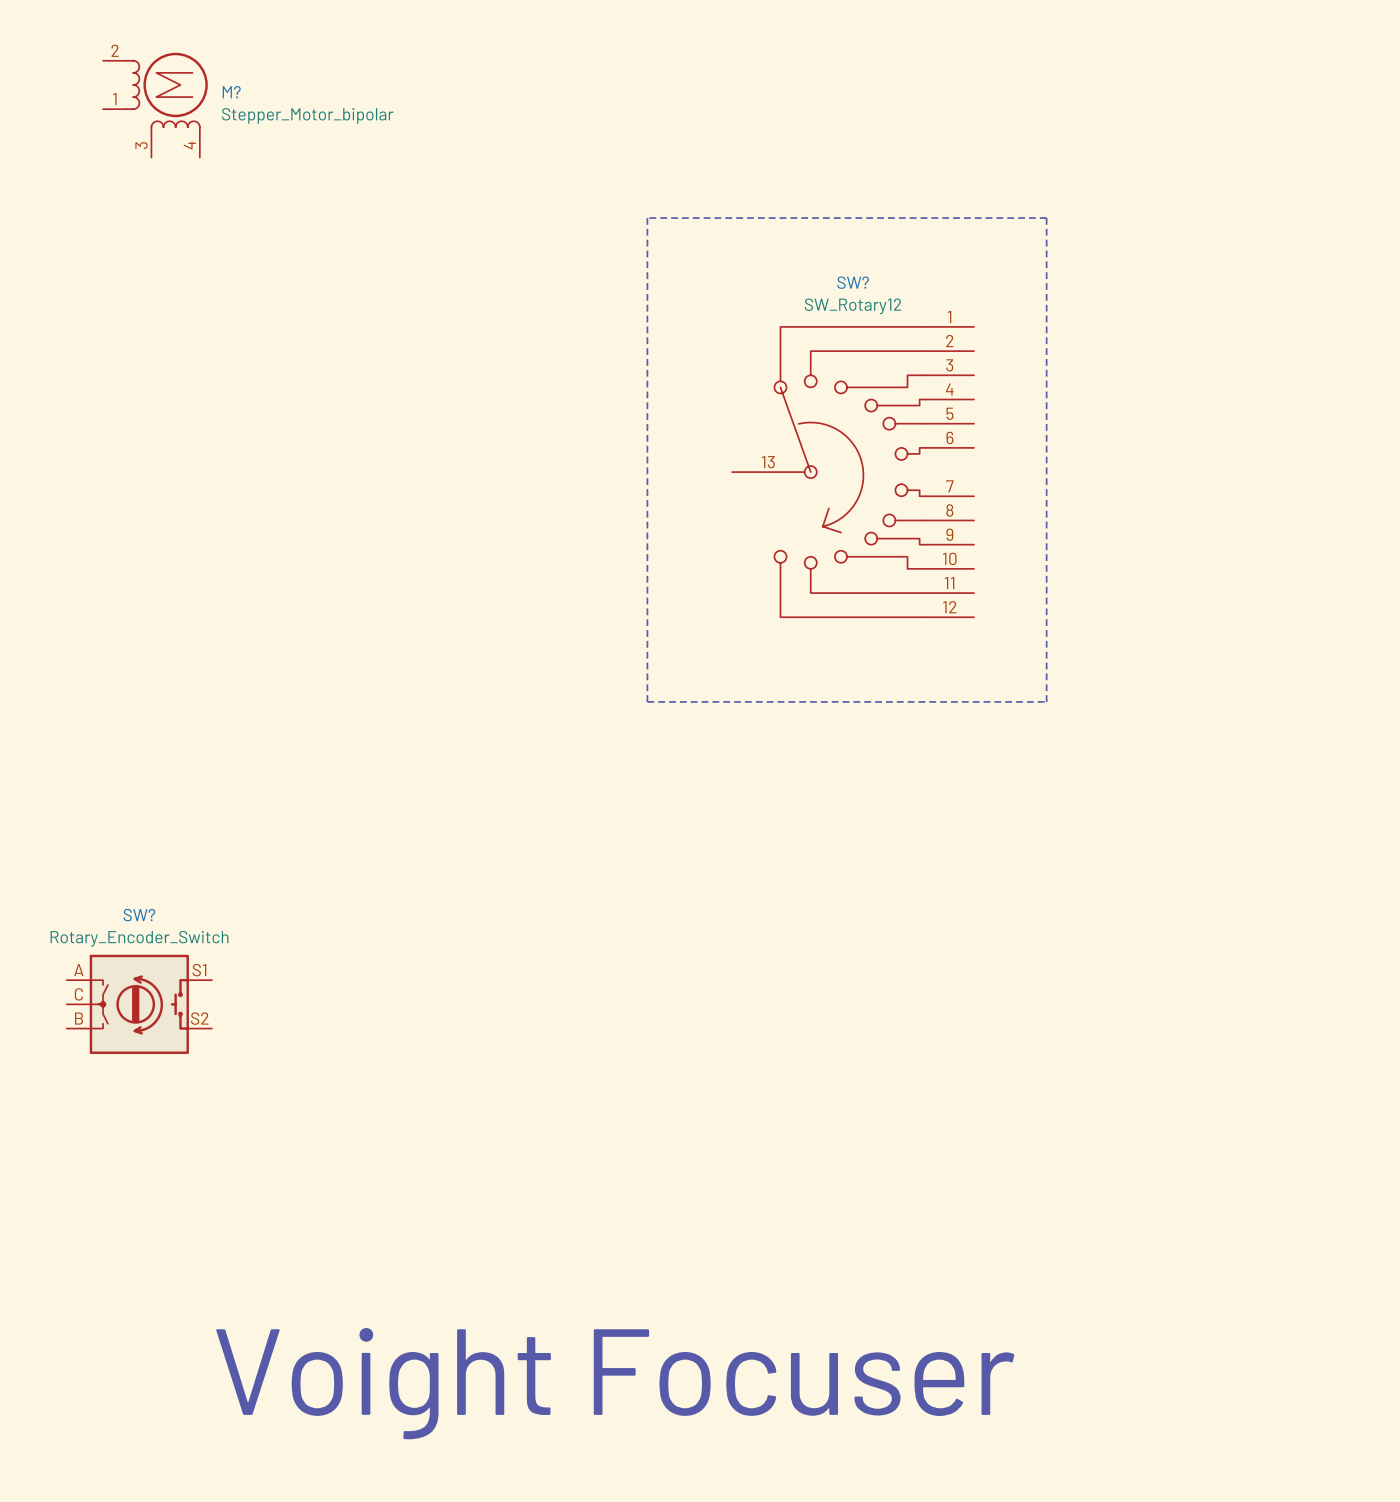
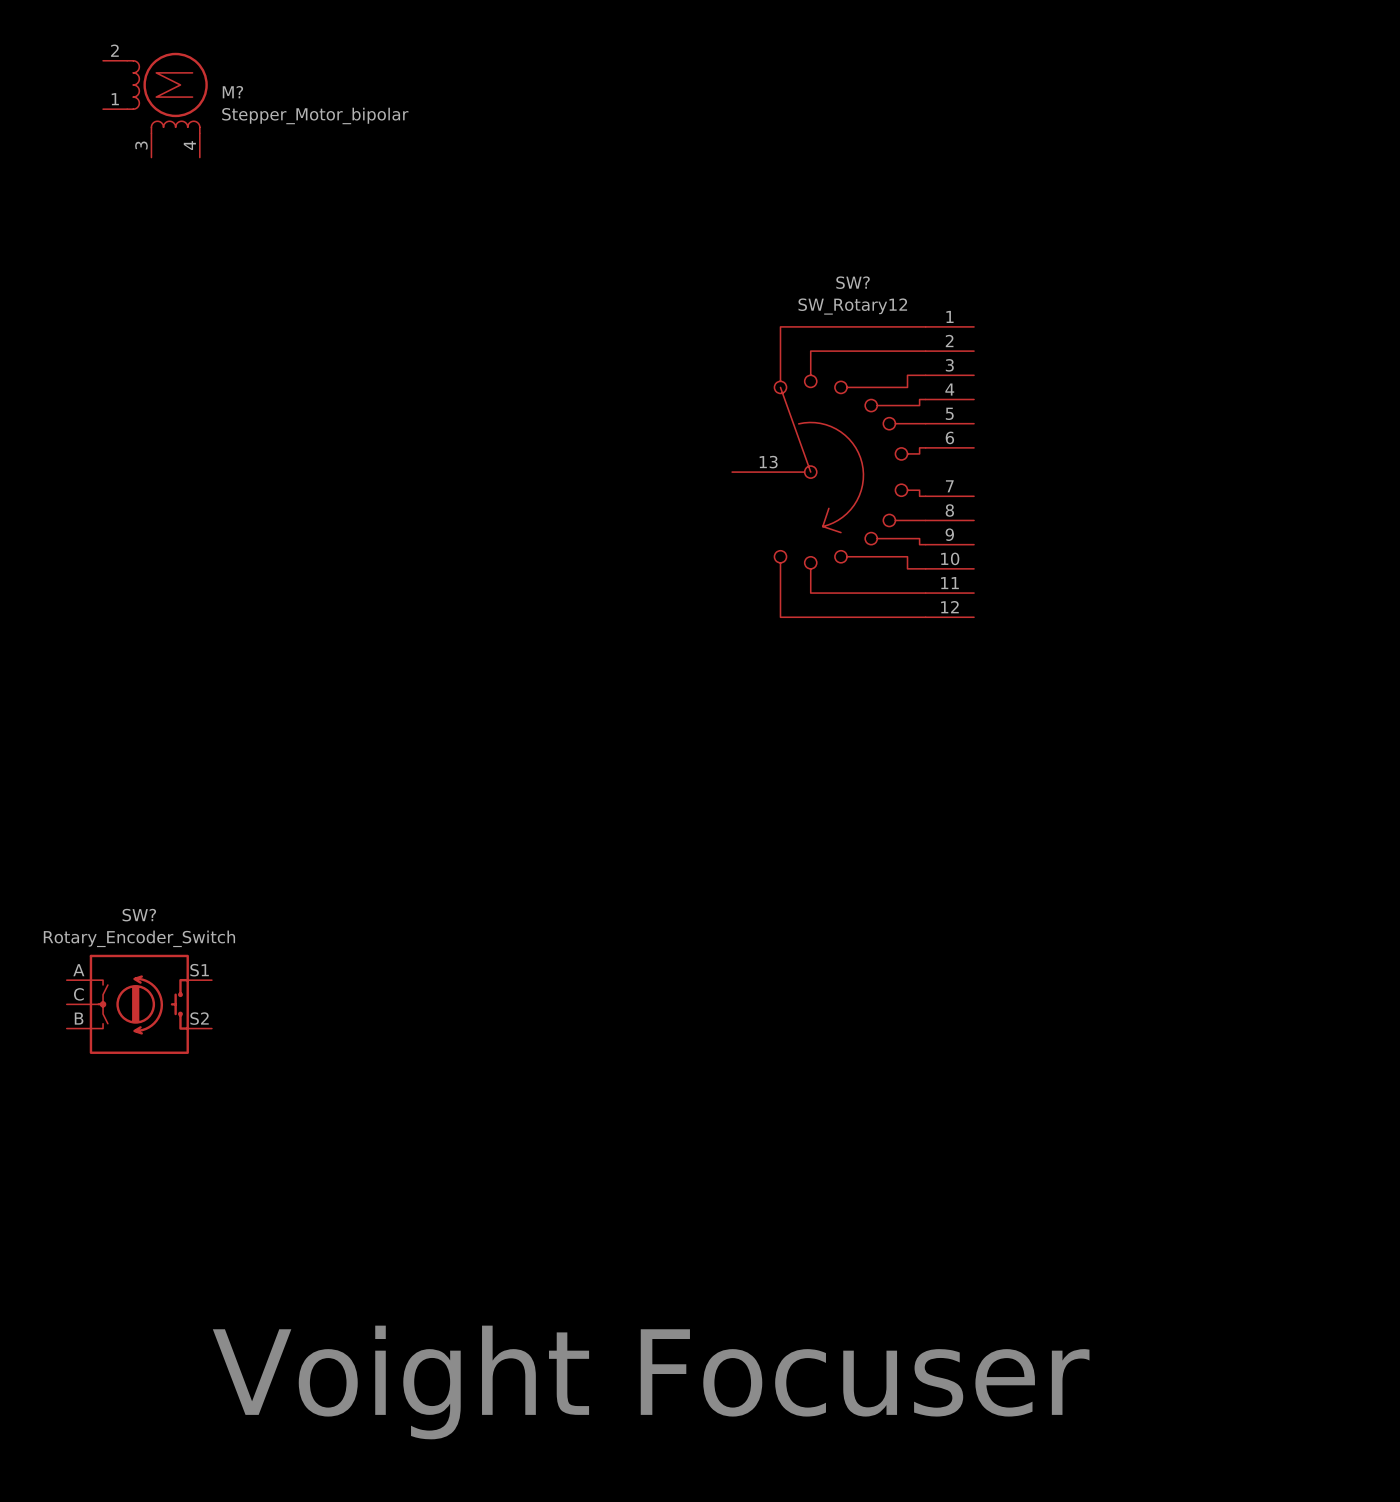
line: (647, 218) (647, 701) (1046, 701) (1046, 218) (647, 218) -> none

